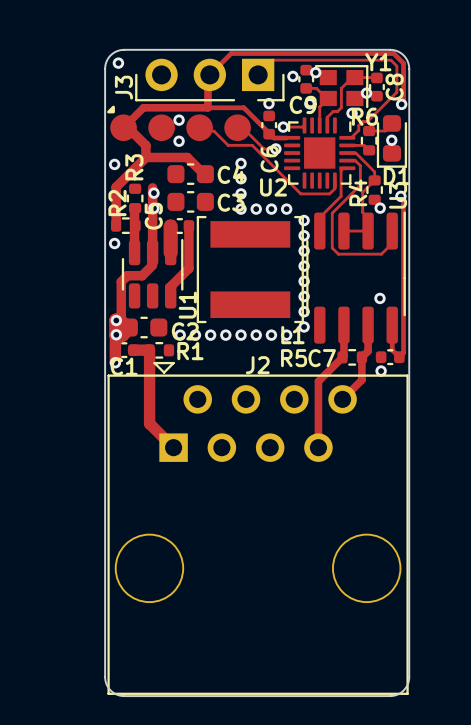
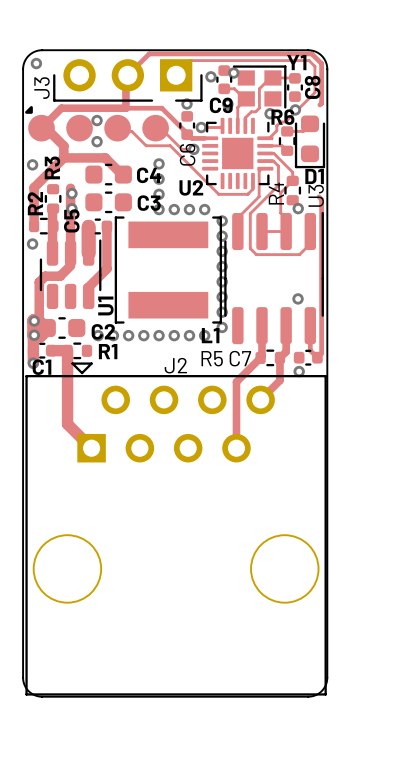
via: (366, 93) -> none
via: (401, 104) -> none
via: none -> (295, 109)
via: (391, 140) -> none
via: (400, 196) -> none

